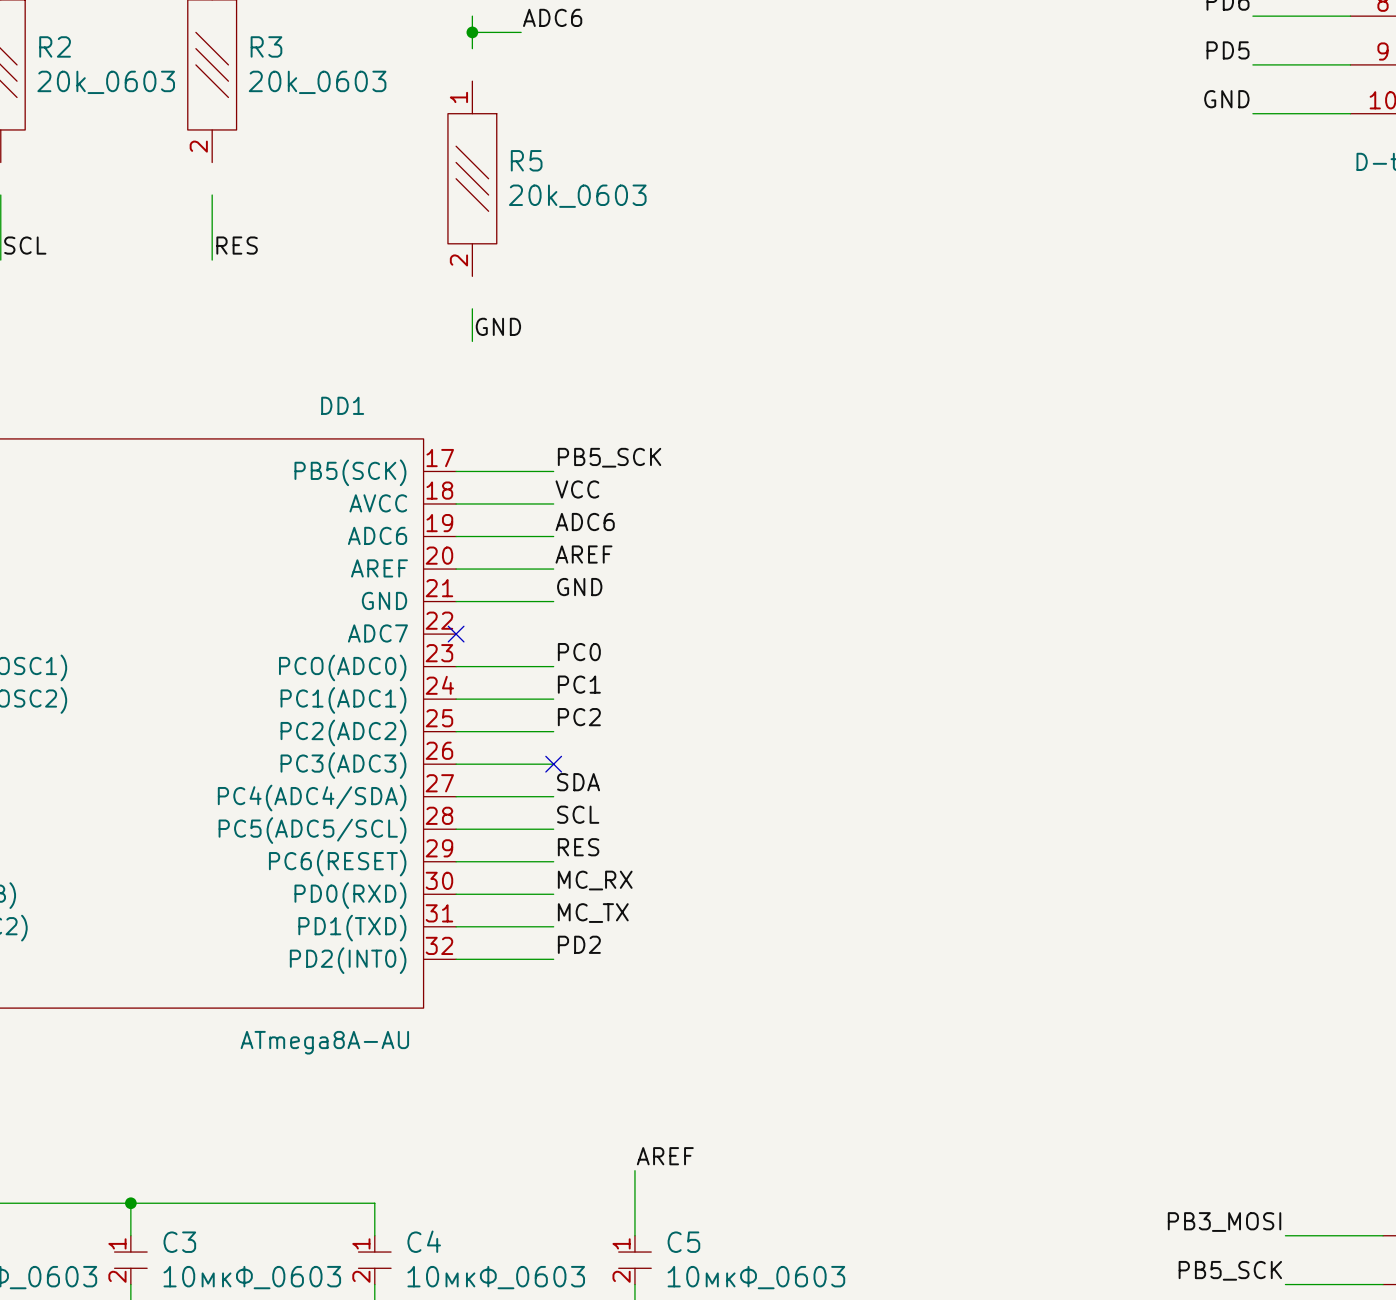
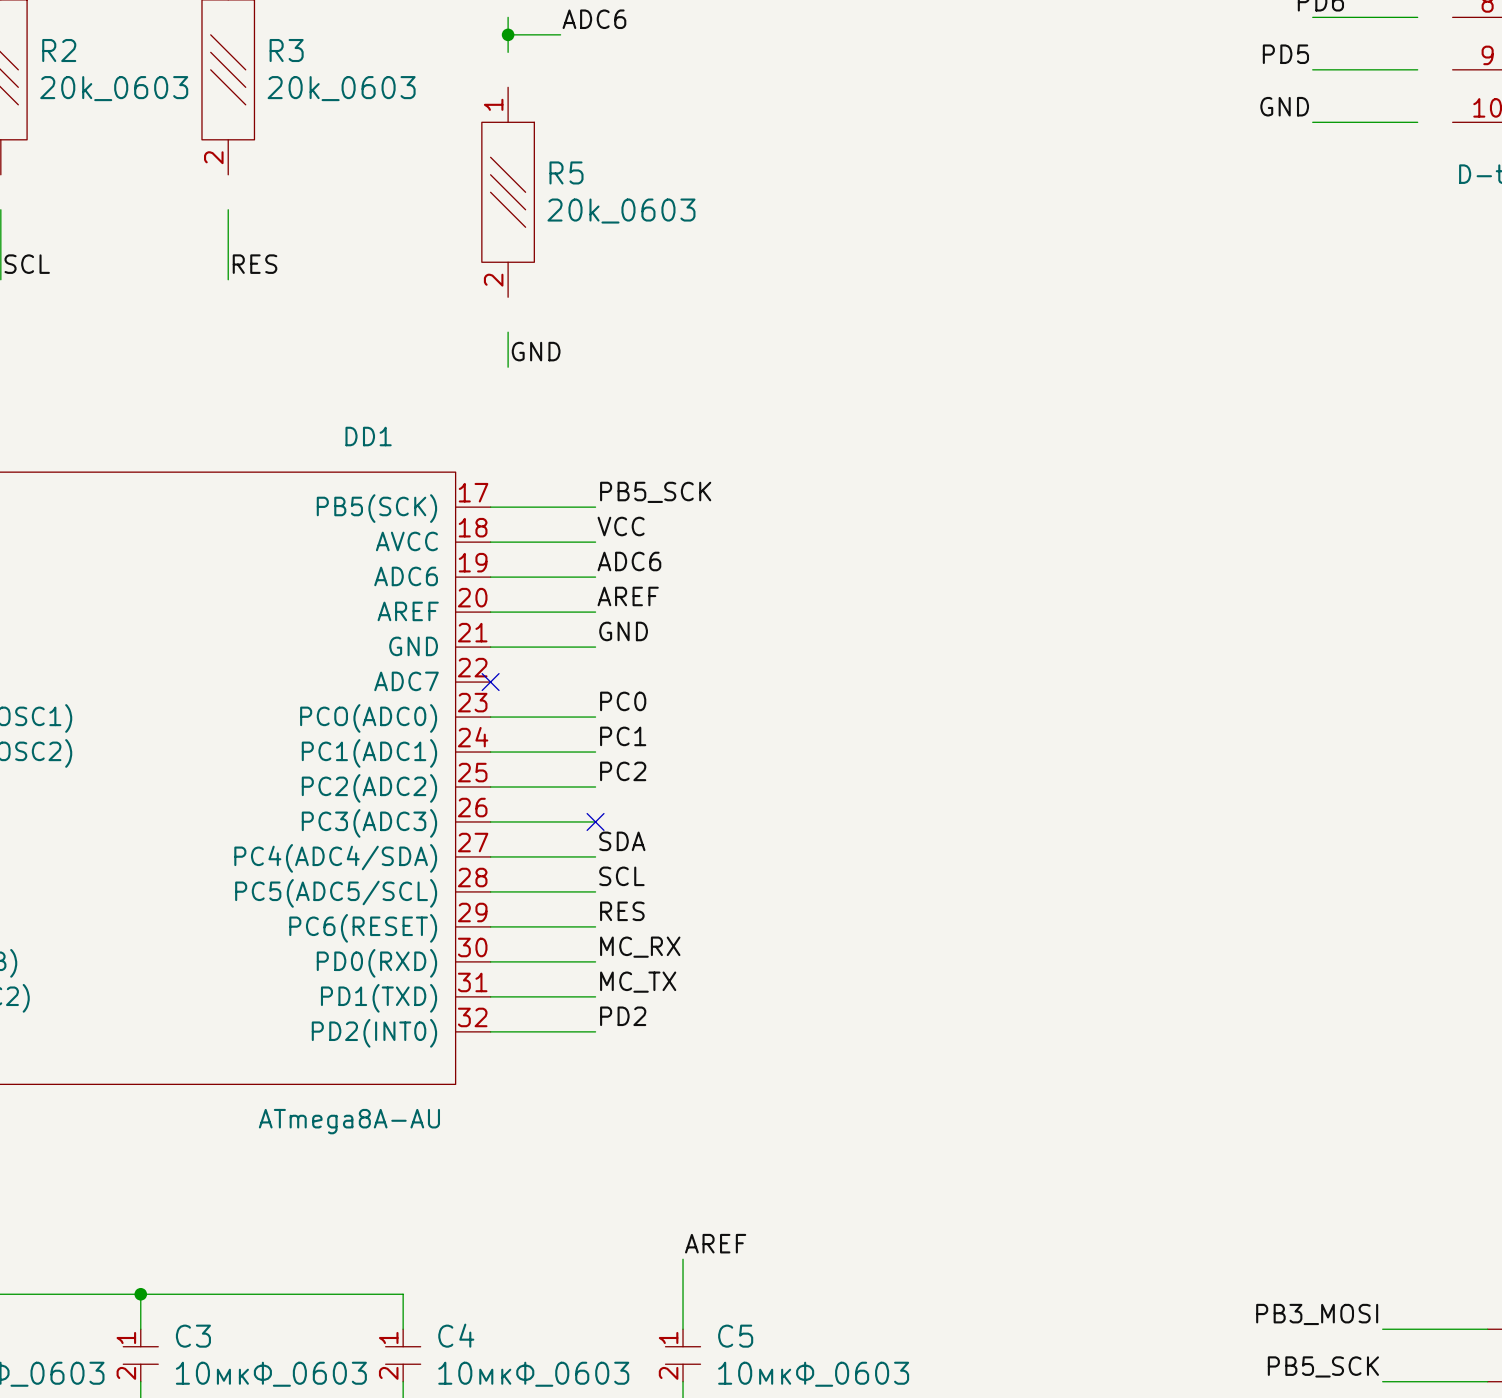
wire: (1317, 16) (1350, 16) -> (1312, 17) (1347, 17)
label position: PD5 (1228, 50) -> PD5 (1285, 54)
wire: (1317, 64) (1350, 64) -> (1312, 69) (1347, 69)
label position: GND (1226, 99) -> GND (1284, 106)
wire: (1317, 113) (1350, 113) -> (1312, 122) (1347, 122)

